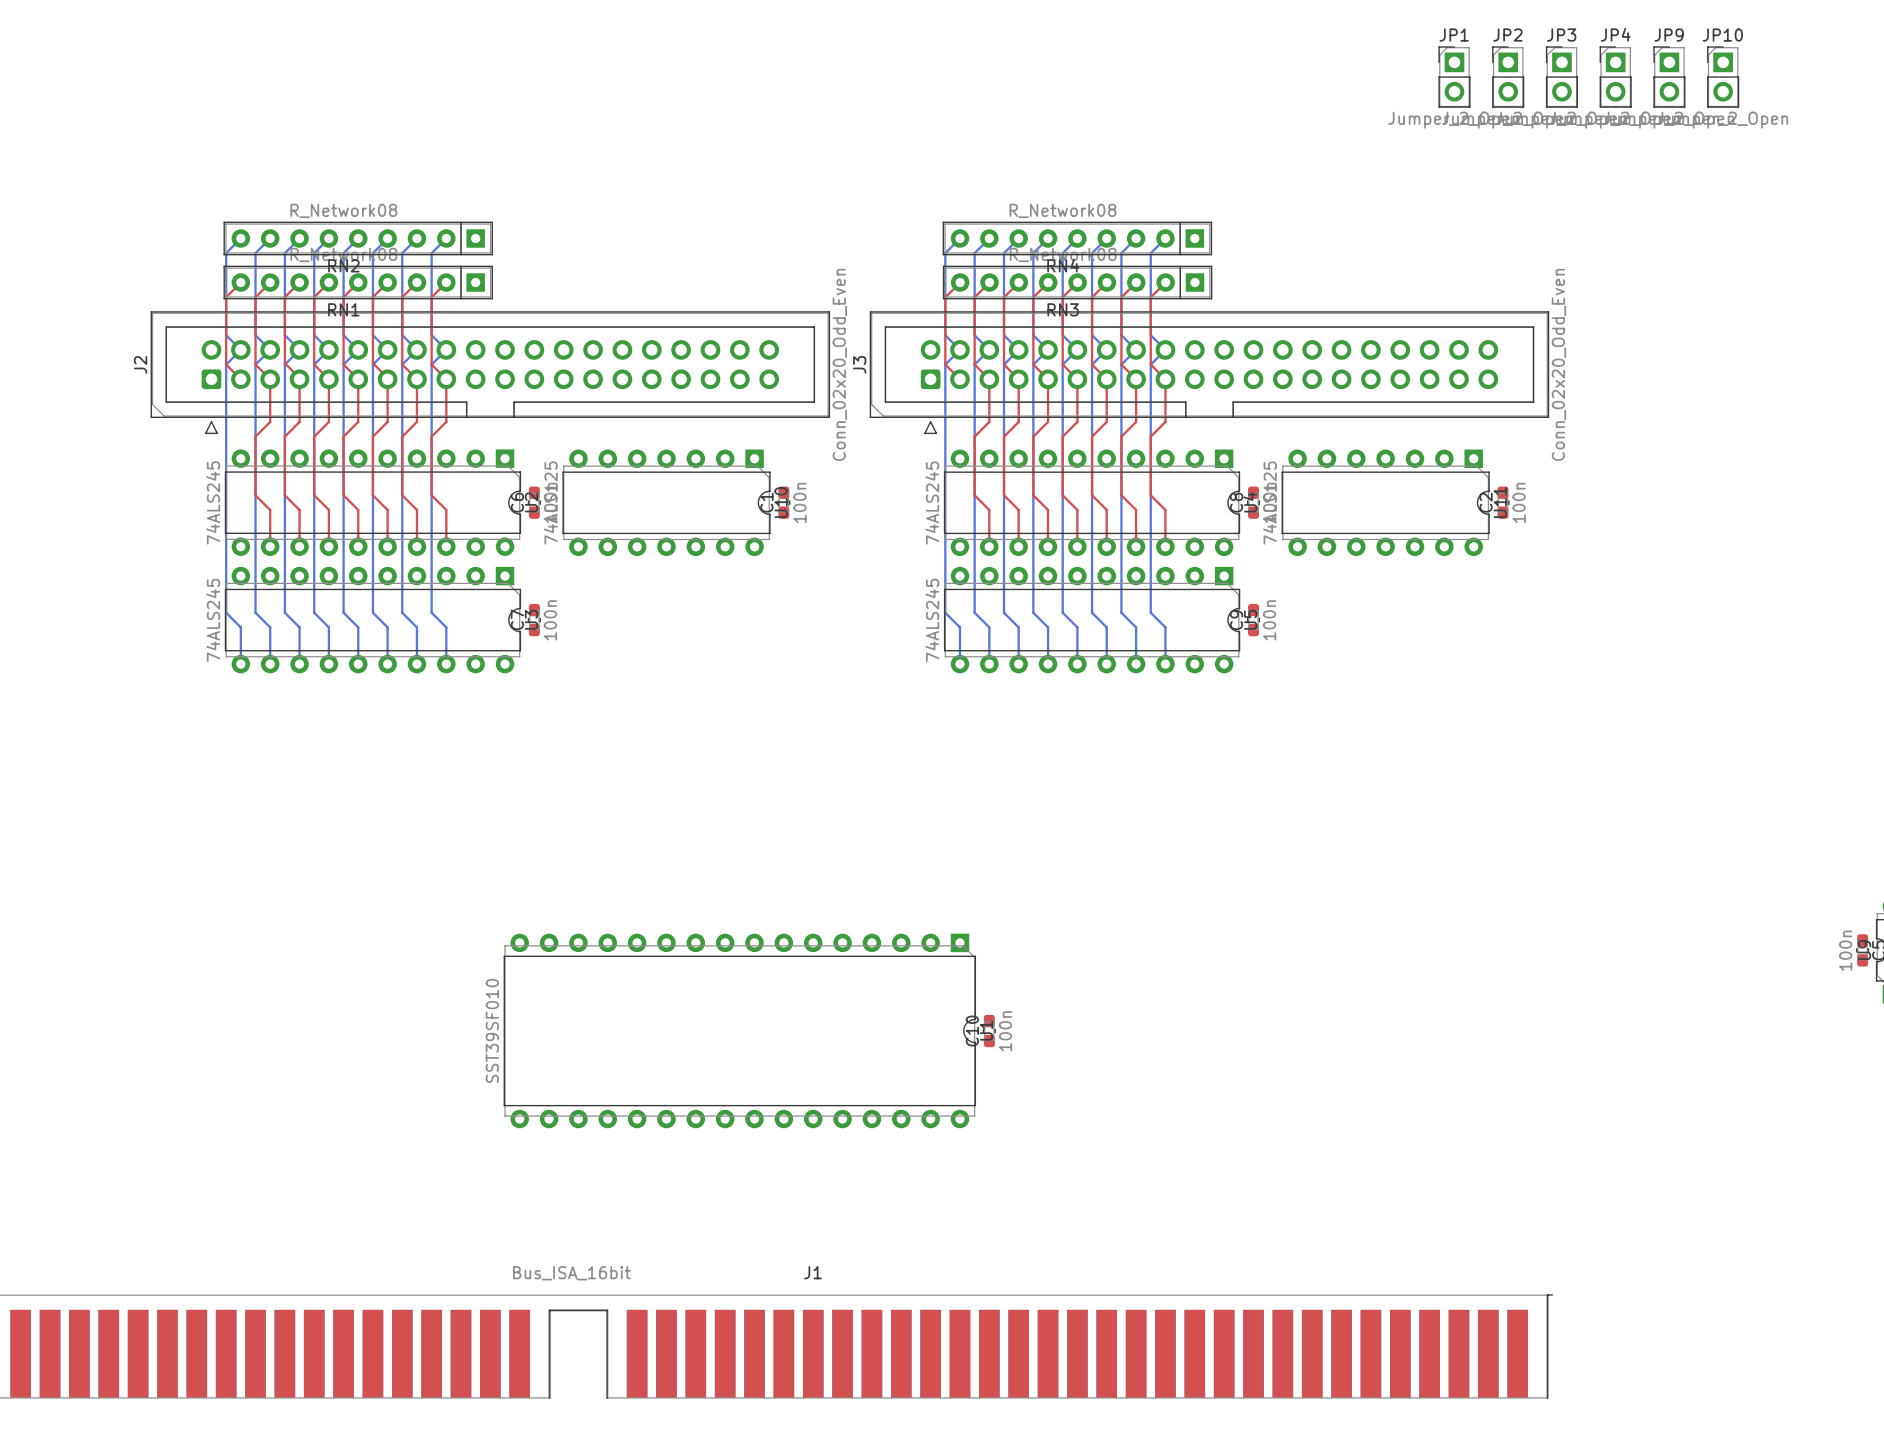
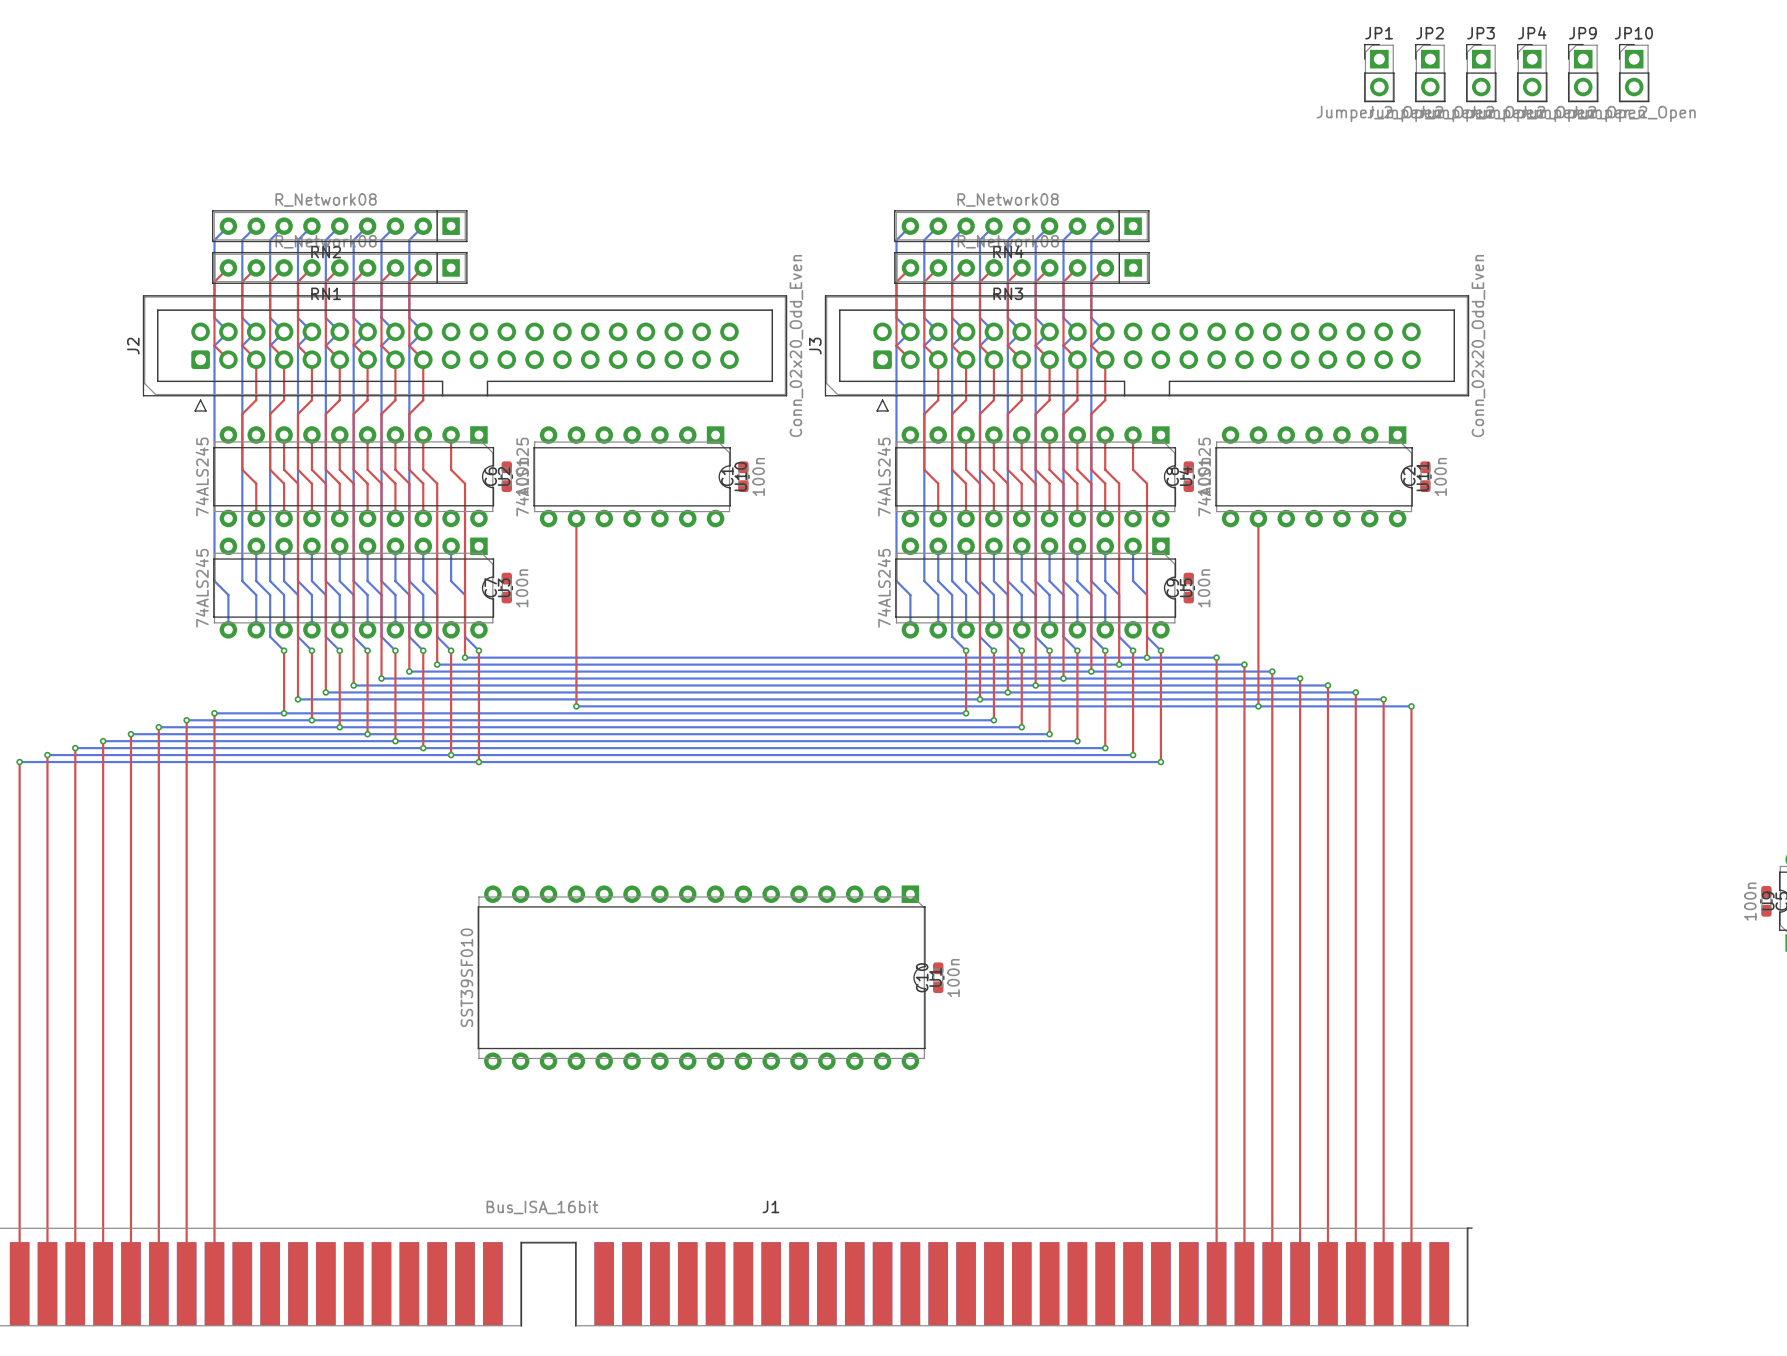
top track: none -> (284, 434) (284, 469) (298, 483) (298, 699)
top track: none -> (311, 434) (311, 469) (325, 483) (325, 692)
top track: none -> (339, 434) (339, 469) (353, 483) (353, 685)
top track: none -> (367, 434) (367, 469) (381, 483) (381, 678)
top track: none -> (395, 434) (395, 469) (409, 483) (409, 671)
top track: none -> (423, 434) (423, 469) (437, 483) (437, 664)
top track: none -> (451, 434) (451, 469) (465, 483) (465, 657)
top track: none -> (966, 435) (966, 469) (979, 483) (979, 699)
top track: none -> (993, 435) (993, 469) (1007, 483) (1007, 692)
top track: none -> (1021, 435) (1021, 469) (1035, 483) (1035, 685)
top track: none -> (1049, 435) (1049, 469) (1063, 483) (1063, 678)
top track: none -> (1077, 435) (1077, 469) (1091, 483) (1091, 671)
top track: none -> (1105, 435) (1105, 469) (1119, 483) (1119, 664)
top track: none -> (1133, 435) (1133, 469) (1147, 483) (1147, 657)
top track: none -> (576, 518) (576, 706)
top track: none -> (1258, 518) (1258, 706)
bottom track: none -> (256, 546) (256, 581) (270, 595) (270, 636) (284, 650)
bottom track: none -> (284, 546) (284, 581) (298, 595) (298, 636) (311, 650)
bottom track: none -> (311, 546) (311, 581) (325, 595) (325, 636) (339, 650)
bottom track: none -> (339, 546) (339, 581) (353, 595) (353, 636) (367, 650)
bottom track: none -> (367, 546) (367, 581) (381, 595) (381, 636) (395, 650)
bottom track: none -> (395, 546) (395, 581) (409, 595) (409, 636) (423, 650)
bottom track: none -> (423, 546) (423, 581) (437, 595) (437, 636) (451, 650)
bottom track: none -> (451, 546) (451, 581) (465, 595) (465, 636) (478, 650)
bottom track: none -> (938, 546) (938, 581) (952, 595) (952, 636) (966, 650)
bottom track: none -> (966, 546) (966, 581) (979, 595) (979, 636) (993, 650)
bottom track: none -> (993, 546) (993, 581) (1007, 595) (1007, 636) (1021, 650)
bottom track: none -> (1021, 546) (1021, 581) (1035, 595) (1035, 636) (1049, 650)
bottom track: none -> (1049, 546) (1049, 581) (1063, 595) (1063, 636) (1077, 650)
bottom track: none -> (1077, 546) (1077, 581) (1091, 595) (1091, 636) (1105, 650)
bottom track: none -> (1105, 546) (1105, 581) (1119, 595) (1119, 636) (1133, 650)
bottom track: none -> (1133, 546) (1133, 581) (1147, 595) (1147, 636) (1160, 650)
top track: none -> (284, 650) (284, 713)
via: none -> (284, 650)
top track: none -> (311, 650) (311, 720)
via: none -> (311, 650)
top track: none -> (339, 650) (339, 727)
via: none -> (339, 650)
top track: none -> (367, 650) (367, 734)
via: none -> (367, 650)
top track: none -> (395, 650) (395, 741)
via: none -> (395, 650)
top track: none -> (423, 650) (423, 748)
via: none -> (423, 650)
top track: none -> (451, 650) (451, 755)
via: none -> (451, 650)
top track: none -> (478, 650) (478, 762)
via: none -> (478, 650)
top track: none -> (966, 650) (966, 713)
via: none -> (966, 650)
top track: none -> (993, 650) (993, 720)
via: none -> (993, 650)
top track: none -> (1021, 650) (1021, 727)
via: none -> (1021, 650)
top track: none -> (1049, 650) (1049, 734)
via: none -> (1049, 650)
top track: none -> (1077, 650) (1077, 741)
via: none -> (1077, 650)
top track: none -> (1105, 650) (1105, 748)
via: none -> (1105, 650)
top track: none -> (1133, 650) (1133, 755)
via: none -> (1133, 650)
top track: none -> (1160, 650) (1160, 762)
via: none -> (1160, 650)
bottom track: none -> (465, 657) (1216, 657)
via: none -> (465, 657)
via: none -> (1147, 657)
top track: none -> (1216, 657) (1216, 1283)
via: none -> (1216, 657)
bottom track: none -> (437, 664) (1244, 664)
via: none -> (437, 664)
via: none -> (1119, 664)
top track: none -> (1244, 664) (1244, 1283)
via: none -> (1244, 664)
bottom track: none -> (409, 671) (1272, 671)
via: none -> (409, 671)
via: none -> (1091, 671)
top track: none -> (1272, 671) (1272, 1283)
via: none -> (1272, 671)
bottom track: none -> (381, 678) (1300, 678)
via: none -> (381, 678)
via: none -> (1063, 678)
top track: none -> (1300, 678) (1300, 1283)
via: none -> (1300, 678)
bottom track: none -> (353, 685) (1327, 685)
via: none -> (353, 685)
via: none -> (1035, 685)
top track: none -> (1327, 685) (1327, 1283)
via: none -> (1327, 685)
bottom track: none -> (325, 692) (1355, 692)
via: none -> (325, 692)
via: none -> (1007, 692)
top track: none -> (1355, 692) (1355, 1283)
via: none -> (1355, 692)
bottom track: none -> (298, 699) (1383, 699)
via: none -> (298, 699)
via: none -> (979, 699)
top track: none -> (1383, 699) (1383, 1283)
via: none -> (1383, 699)
bottom track: none -> (576, 706) (1411, 706)
via: none -> (576, 706)
via: none -> (1258, 706)
top track: none -> (1411, 706) (1411, 1283)
via: none -> (1411, 706)
bottom track: none -> (214, 713) (966, 713)
top track: none -> (214, 713) (214, 1283)
via: none -> (214, 713)
via: none -> (284, 713)
via: none -> (966, 713)
bottom track: none -> (186, 720) (993, 720)
top track: none -> (186, 720) (186, 1283)
via: none -> (186, 720)
via: none -> (311, 720)
via: none -> (993, 720)
bottom track: none -> (158, 727) (1021, 727)
top track: none -> (158, 727) (158, 1283)
via: none -> (158, 727)
via: none -> (339, 727)
via: none -> (1021, 727)
bottom track: none -> (130, 734) (1049, 734)
top track: none -> (130, 734) (130, 1283)
via: none -> (130, 734)
via: none -> (367, 734)
via: none -> (1049, 734)
bottom track: none -> (103, 741) (1077, 741)
top track: none -> (103, 741) (103, 1283)
via: none -> (103, 741)
via: none -> (395, 741)
via: none -> (1077, 741)
bottom track: none -> (75, 748) (1105, 748)
top track: none -> (75, 748) (75, 1283)
via: none -> (75, 748)
via: none -> (423, 748)
via: none -> (1105, 748)
bottom track: none -> (47, 755) (1133, 755)
top track: none -> (47, 755) (47, 1283)
via: none -> (47, 755)
via: none -> (451, 755)
via: none -> (1133, 755)
bottom track: none -> (19, 762) (1160, 762)
top track: none -> (19, 762) (19, 1283)
via: none -> (19, 762)
via: none -> (478, 762)
via: none -> (1160, 762)

